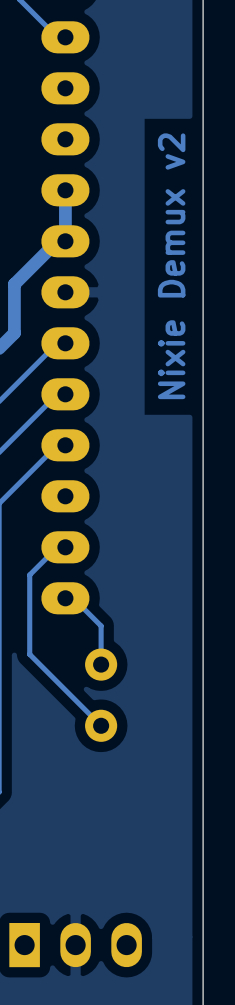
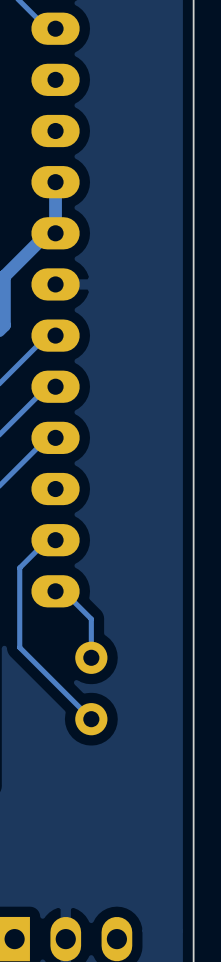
text: Nixie Demux v2 (171, 266) -> none

